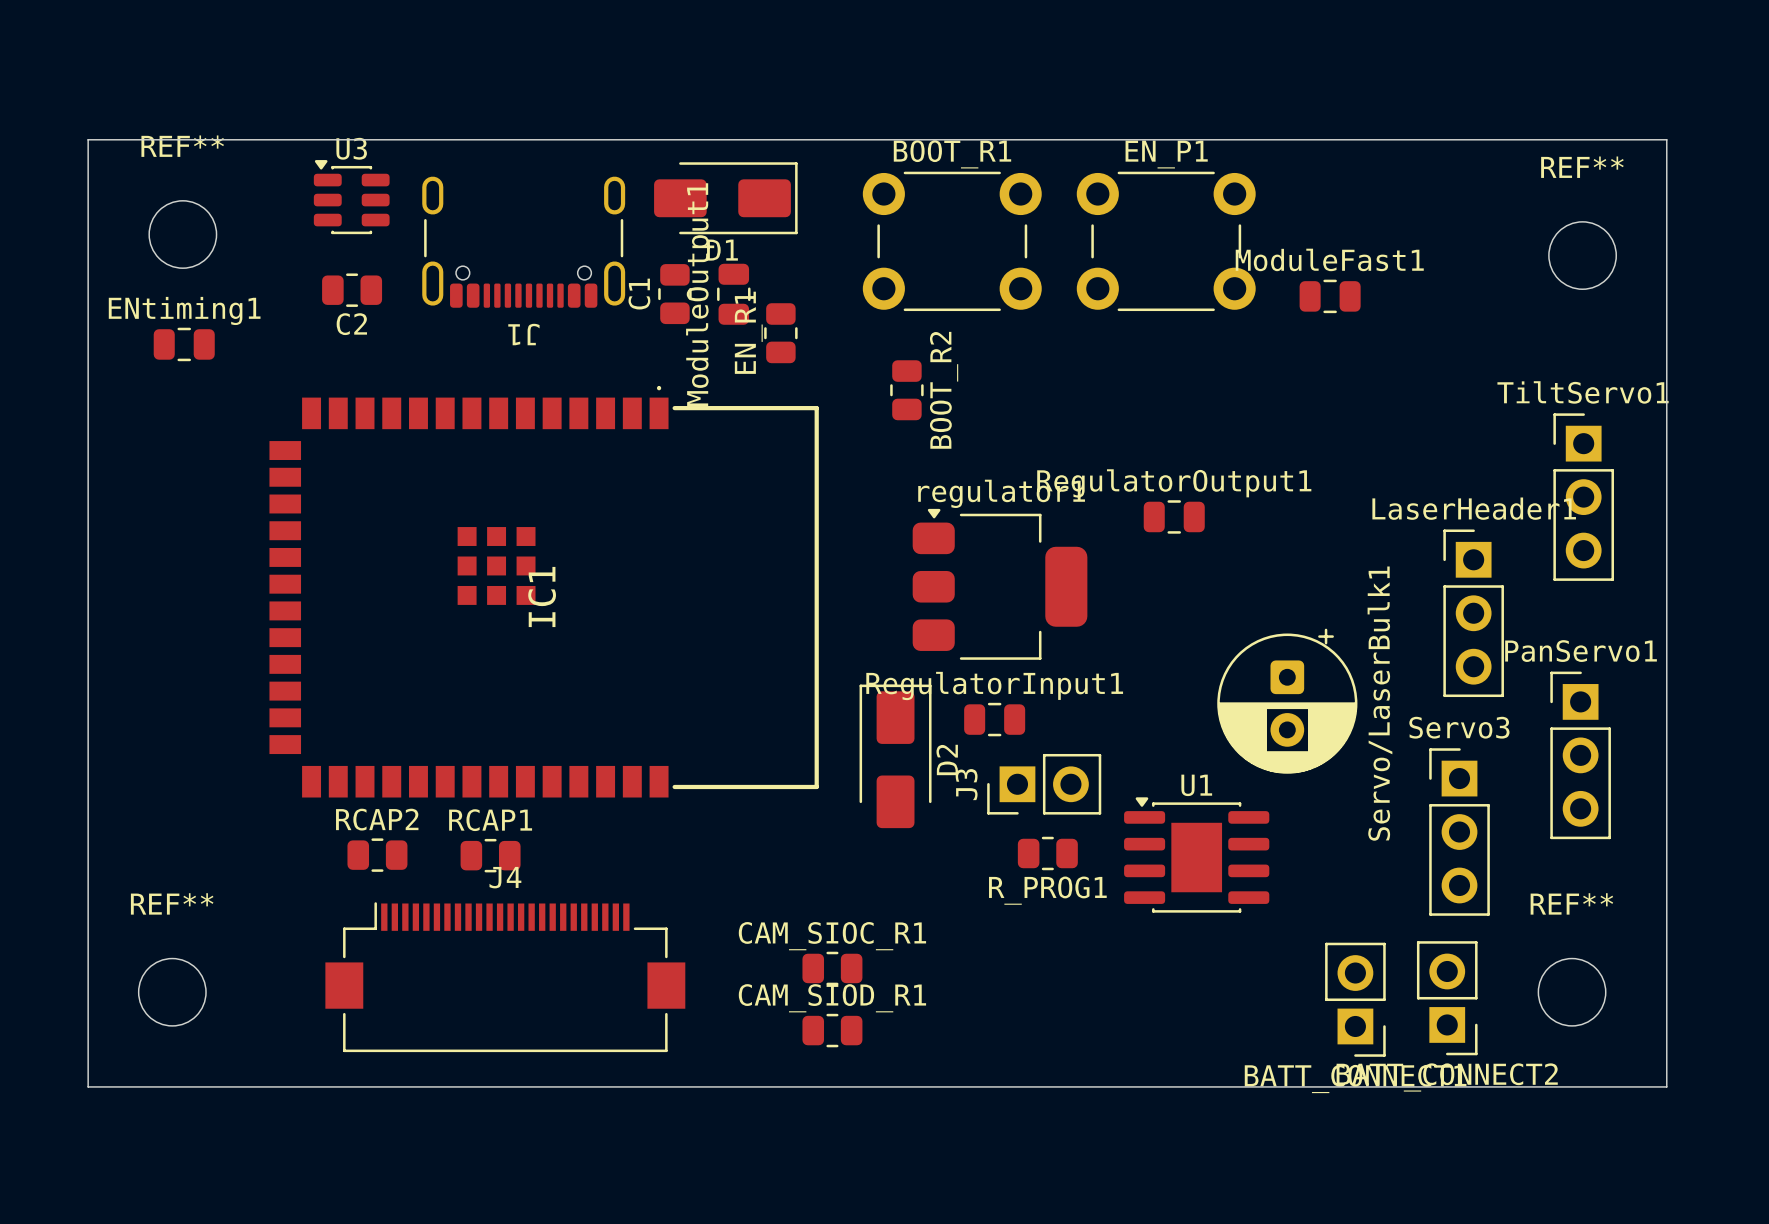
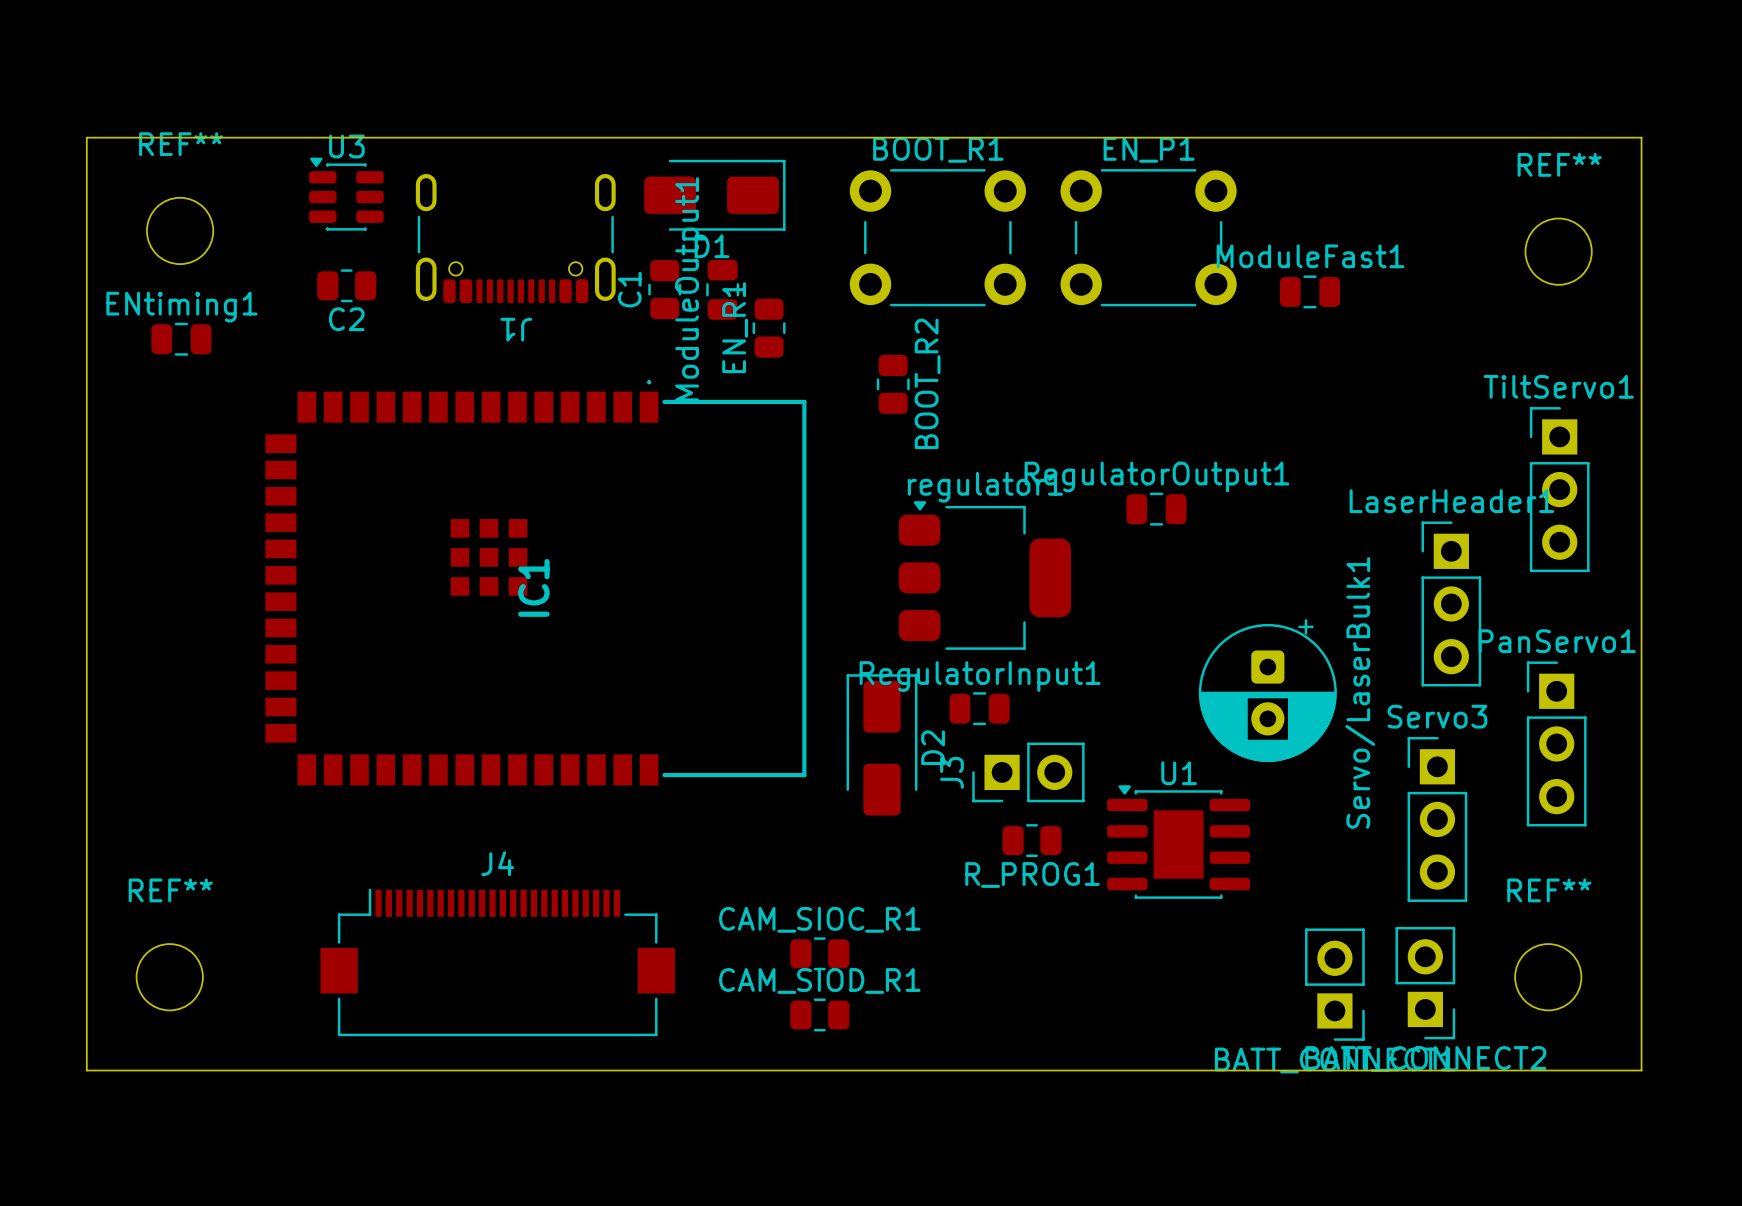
RCAP2: (377, 855) -> none
RCAP1: (490, 855) -> none

